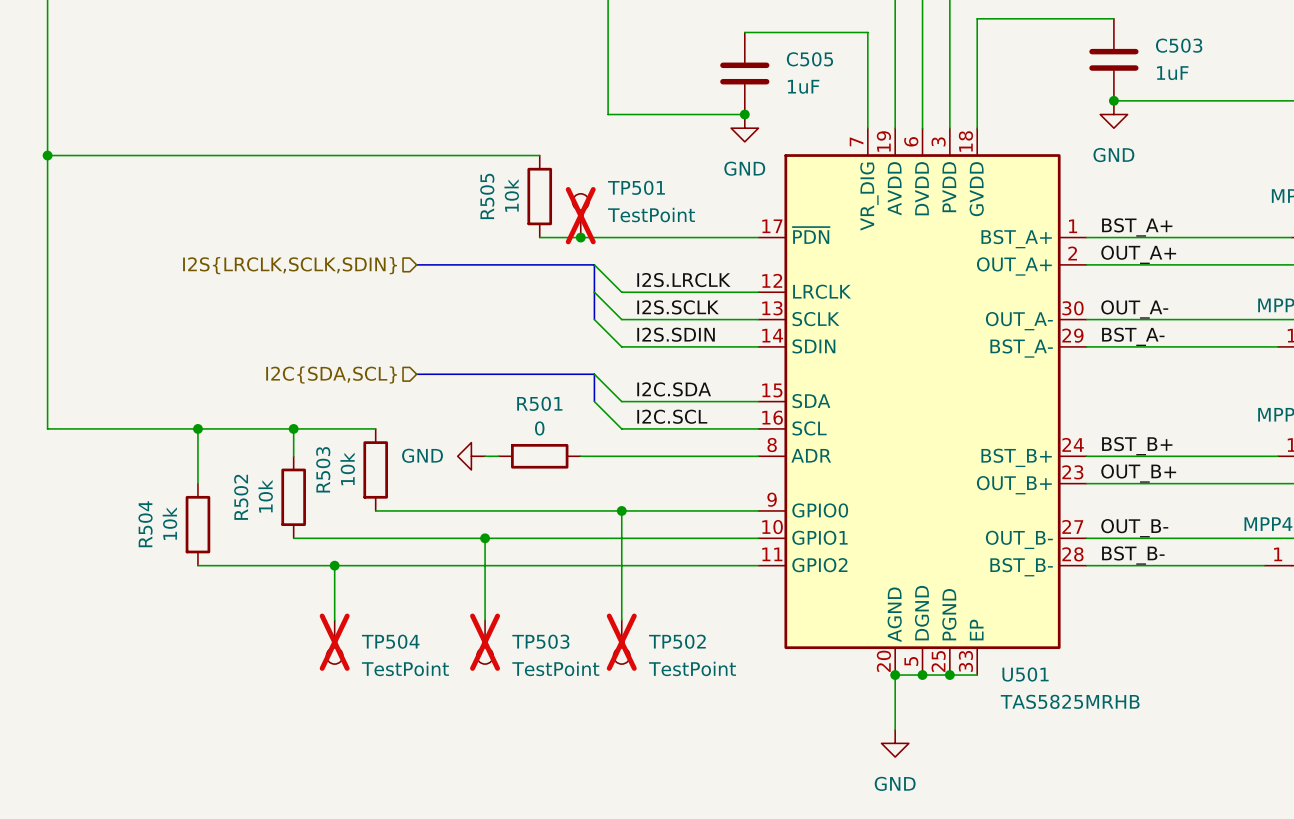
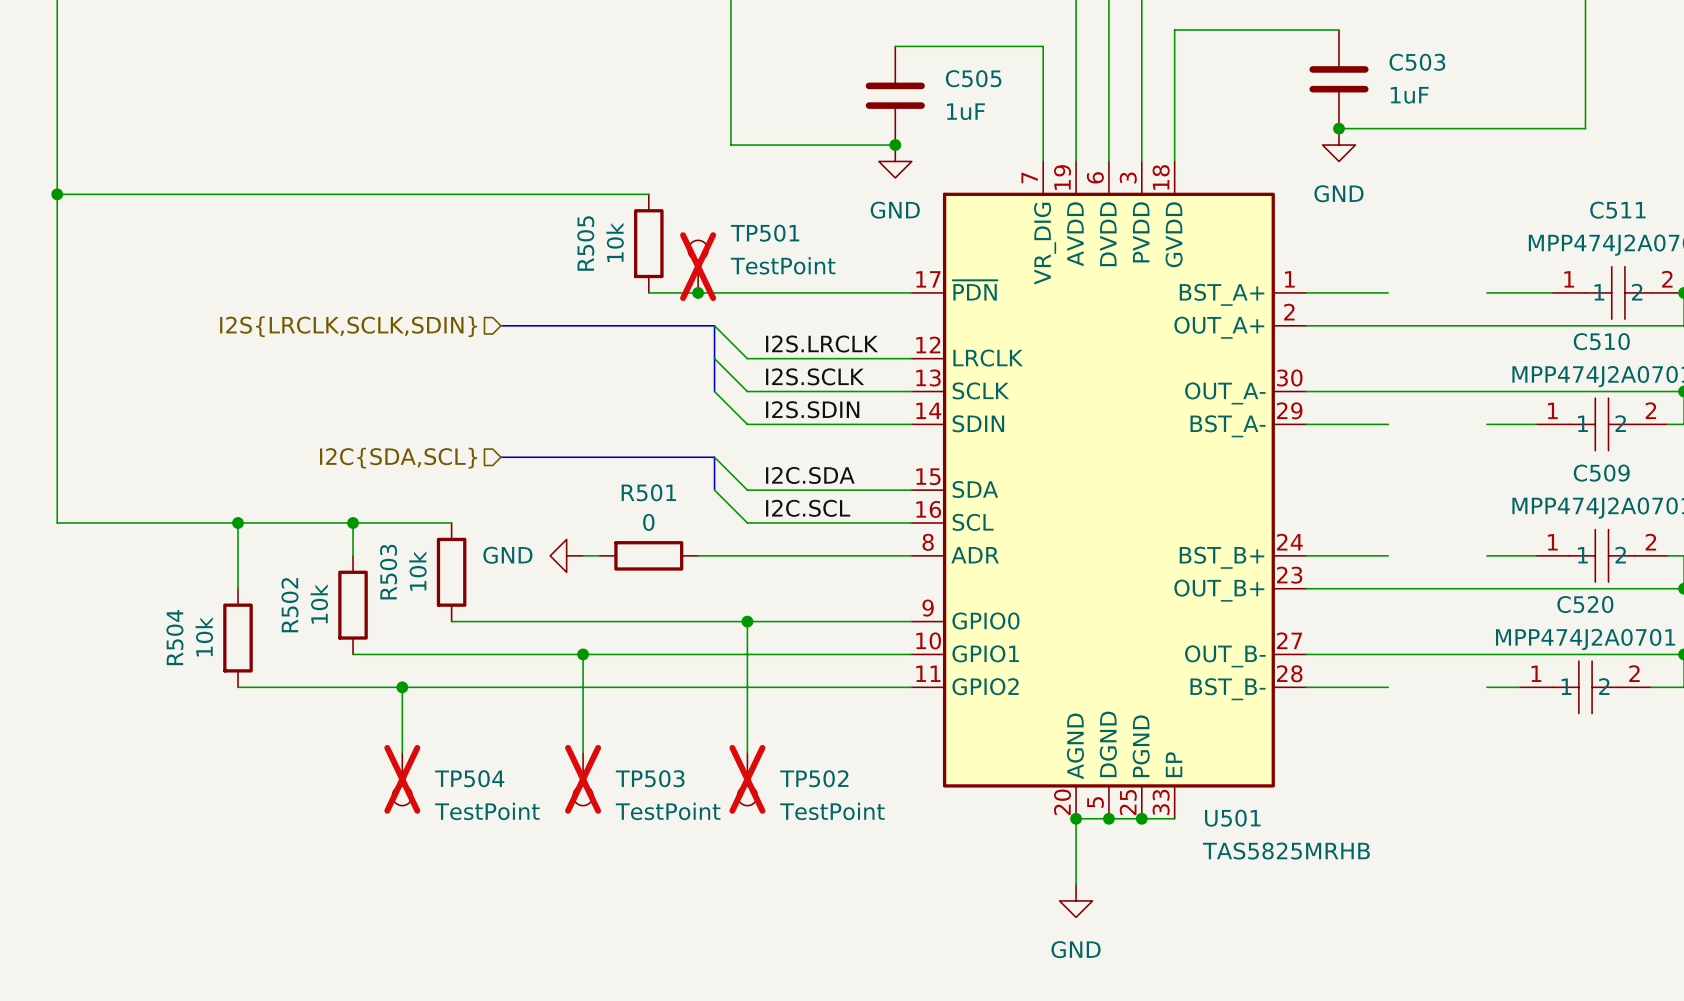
label: BST_A+ (1137, 227) -> none
wire: (1154, 237) (1236, 237) -> none
label: OUT_A+ (1138, 254) -> none
label: OUT_A- (1134, 309) -> none
label: BST_A- (1133, 336) -> none
wire: (1154, 346) (1236, 346) -> none
label: BST_B+ (1137, 446) -> none
wire: (1154, 456) (1236, 456) -> none
label: OUT_B+ (1138, 473) -> none
label: OUT_B- (1134, 528) -> none
label: BST_B- (1133, 555) -> none
wire: (1154, 565) (1236, 565) -> none

